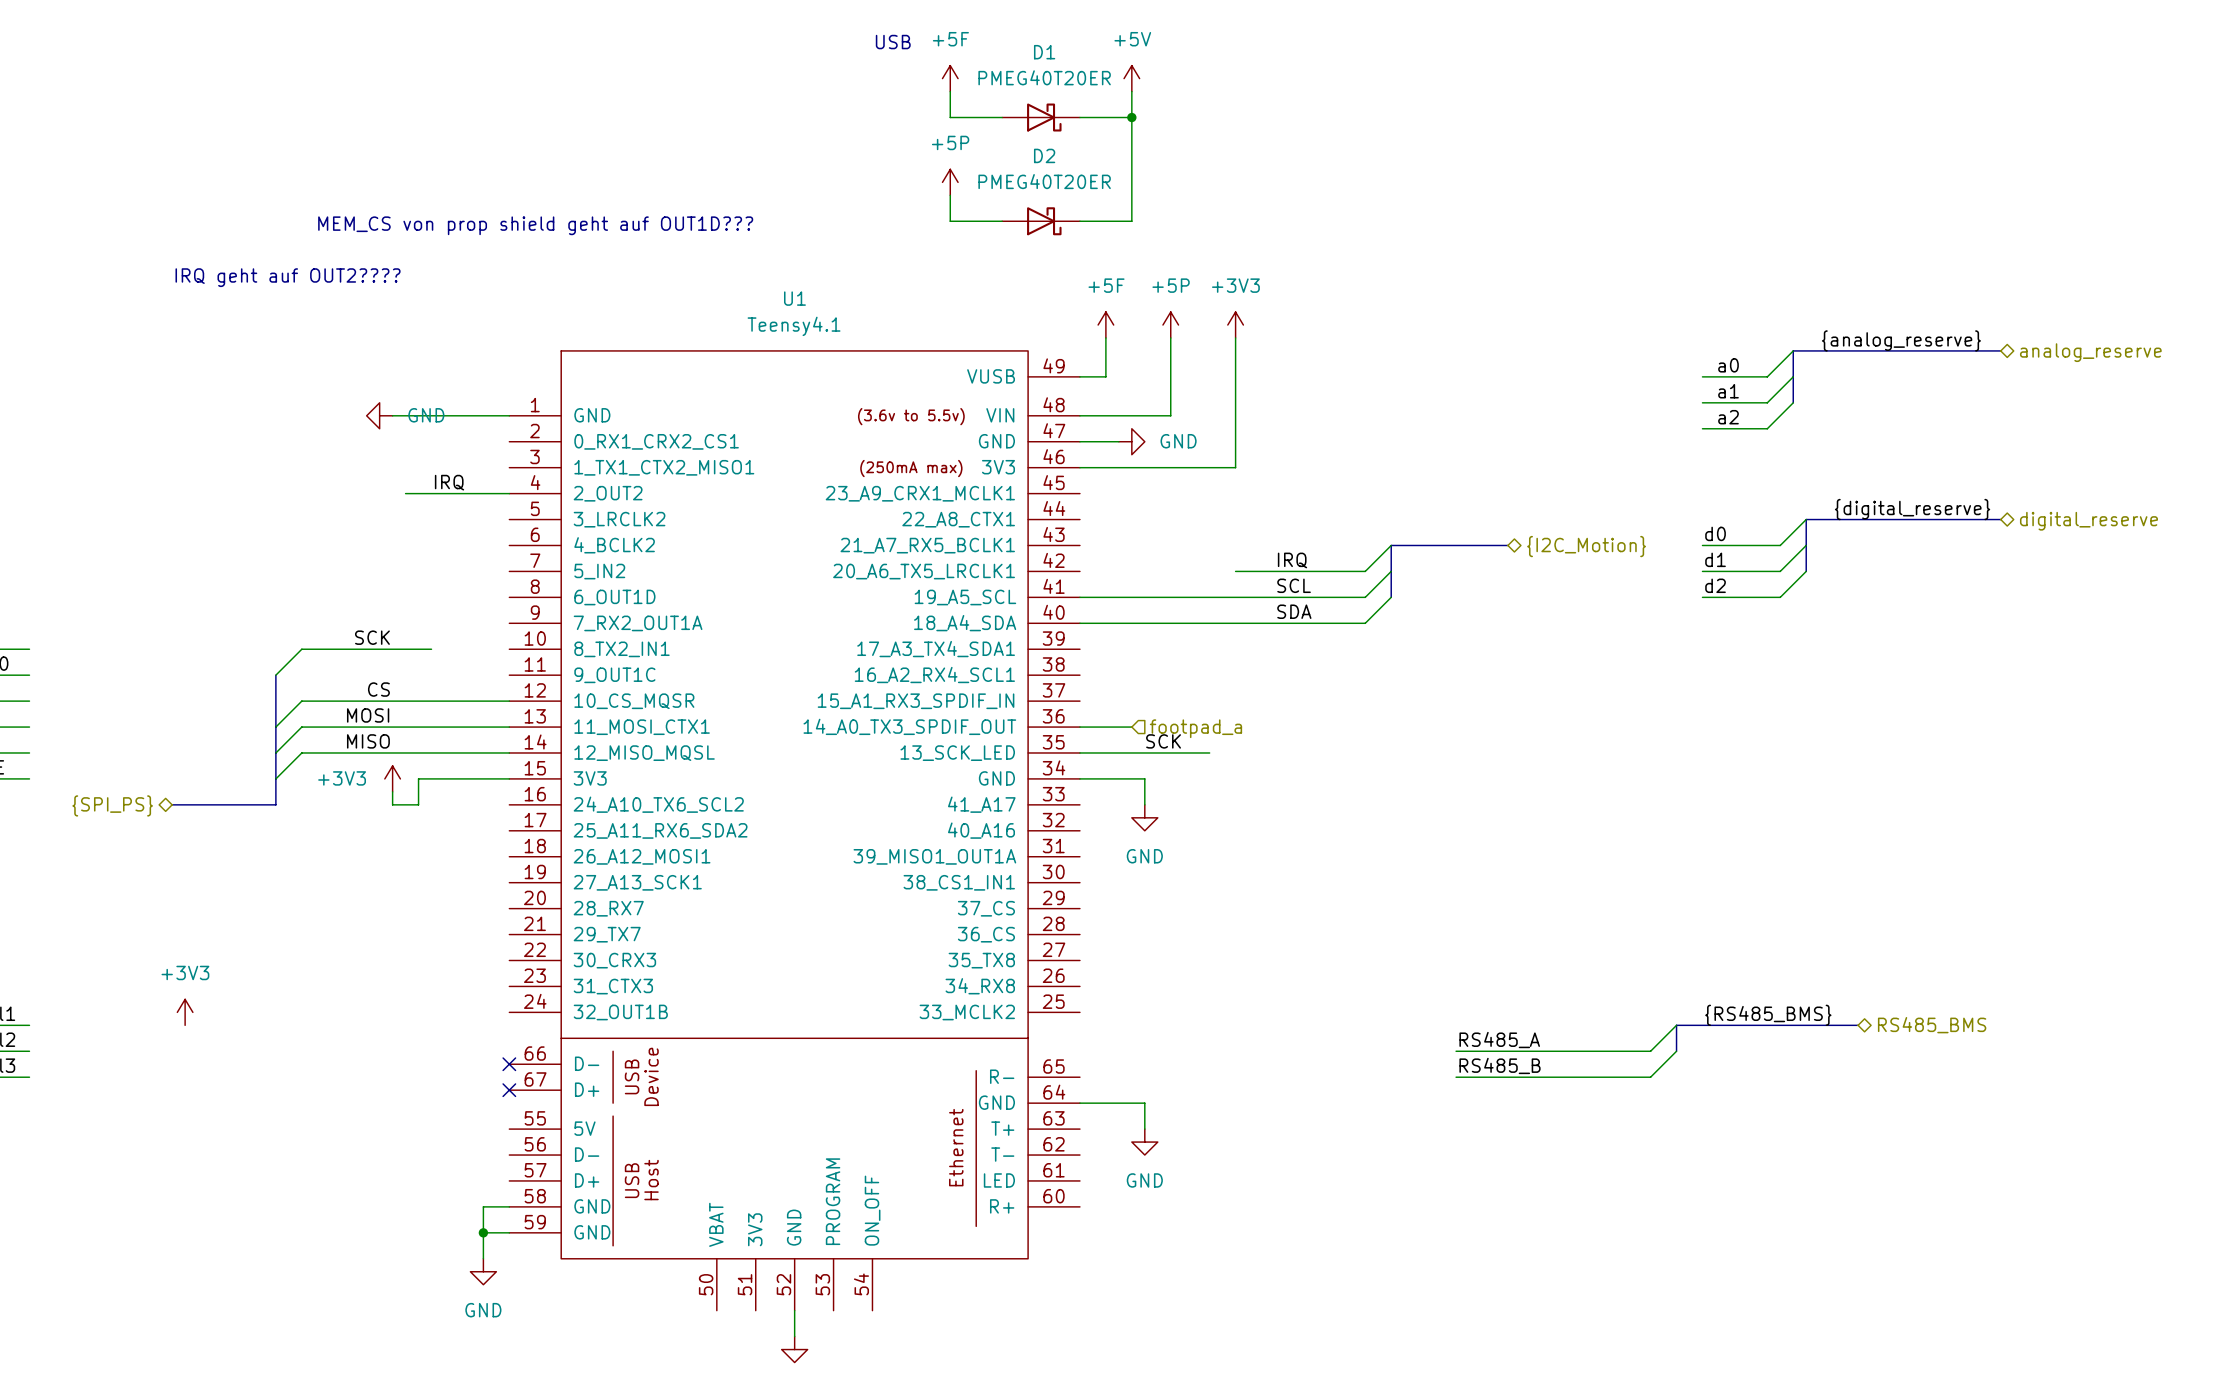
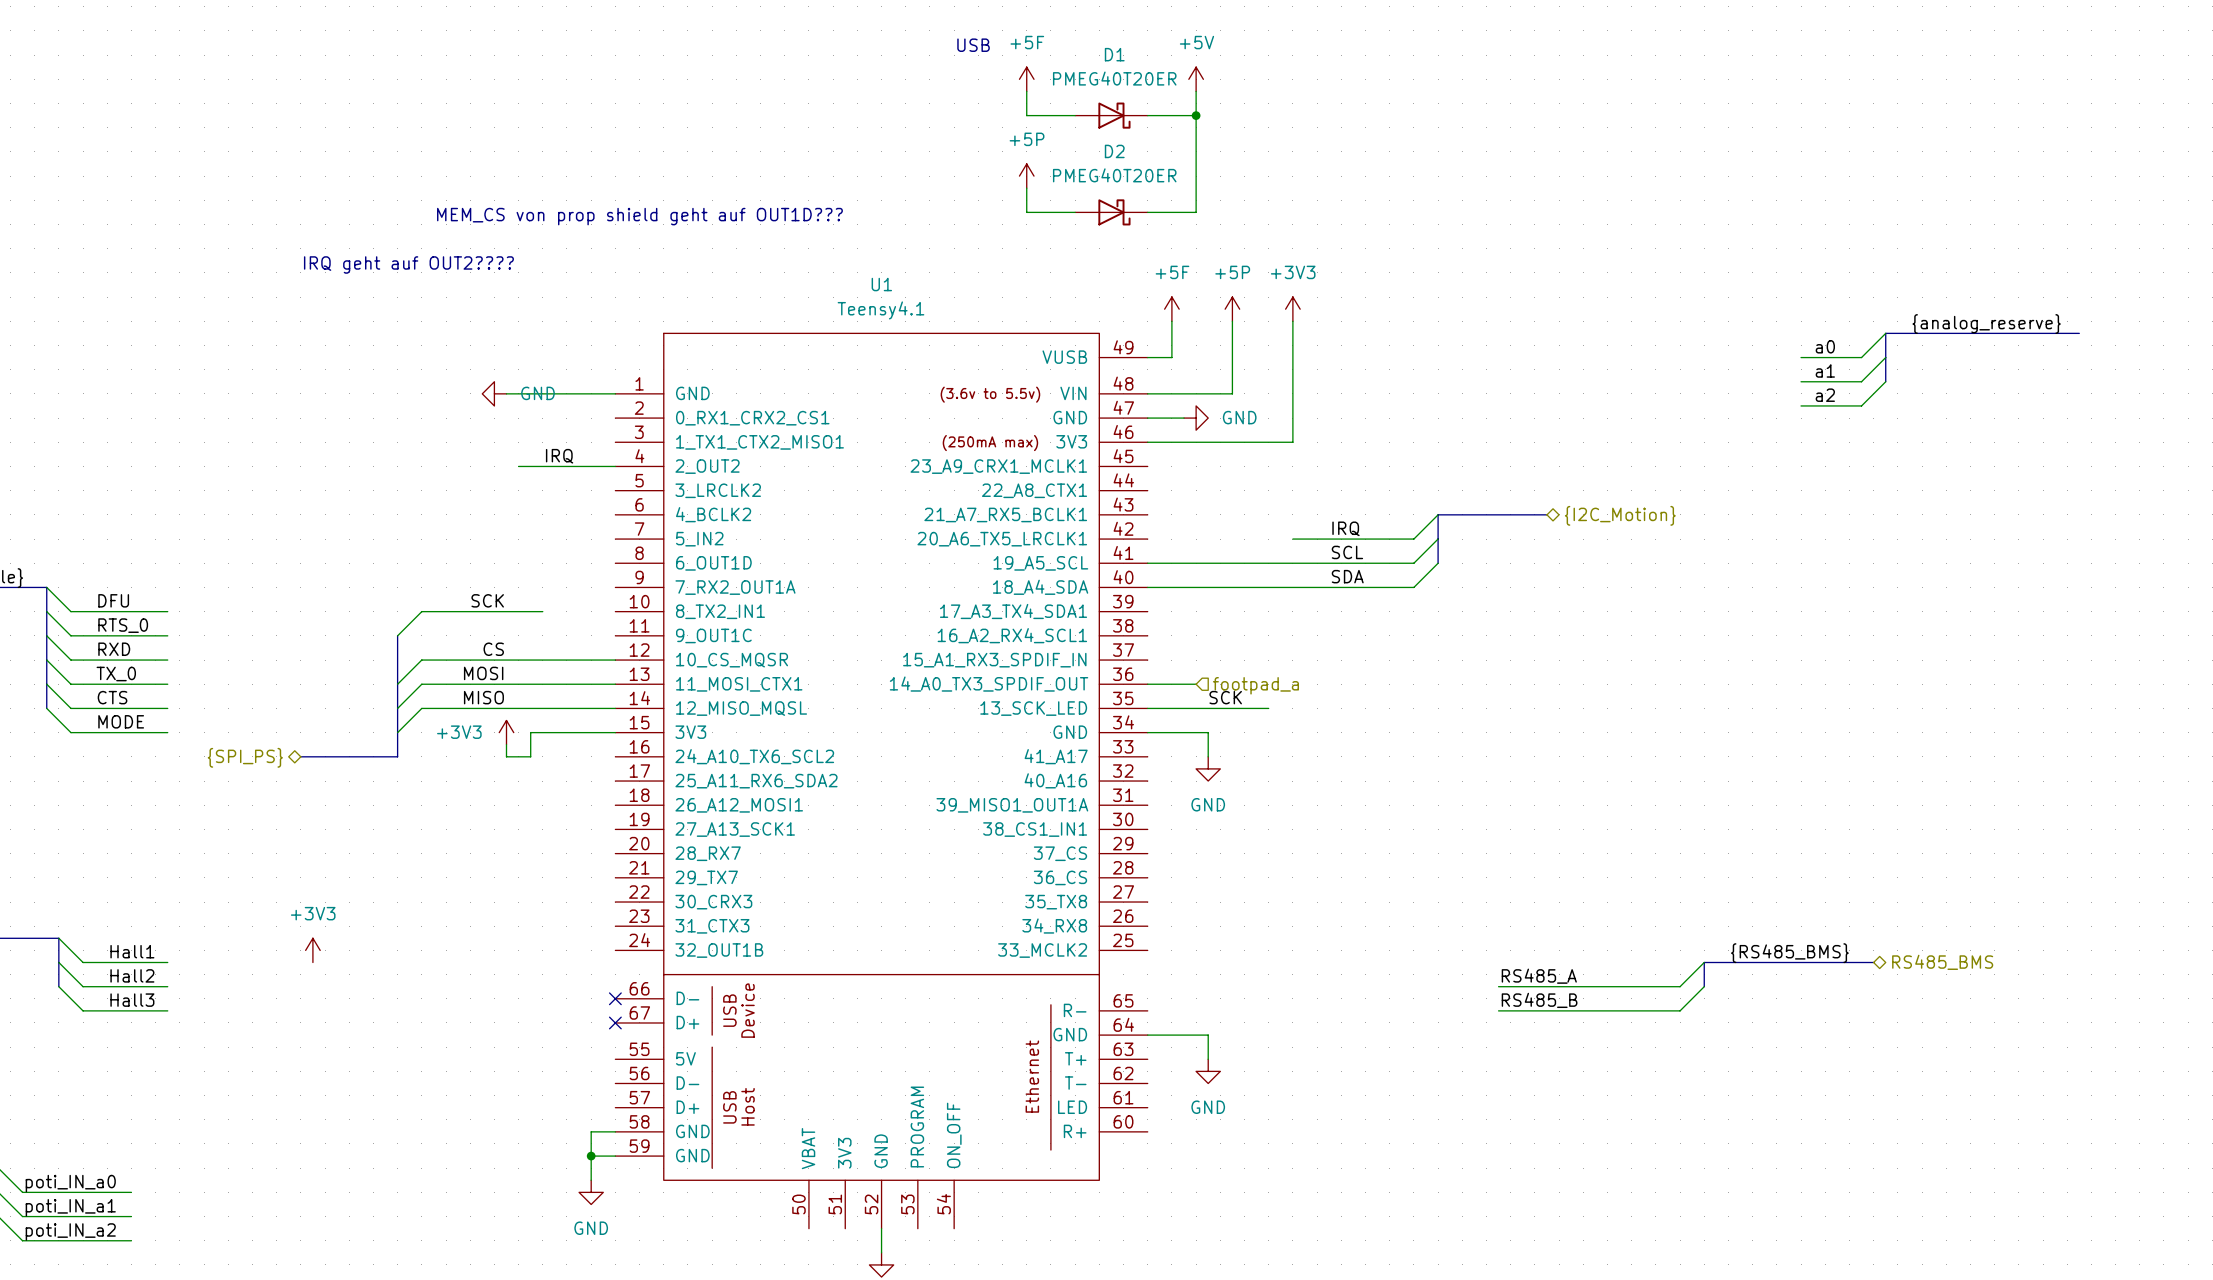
label position: {analog_reserve} (1901, 340) -> {analog_reserve} (1986, 324)
wire: (1793, 350) (1767, 376) (1702, 376) -> (1885, 333) (1861, 357) (1801, 357)
bus: (1871, 350) (1793, 350) (1793, 402) -> (1885, 333) (1885, 381)
bus: none -> (2006, 333) (2079, 333)
hierarchical label: analog_reserve (2090, 352) -> none
label position: a0 (1728, 365) -> a0 (1825, 346)
wire: (1793, 376) (1767, 402) (1702, 402) -> (1885, 357) (1861, 381) (1801, 381)
label position: a1 (1728, 391) -> a1 (1825, 370)
wire: (1793, 402) (1767, 428) (1702, 428) -> (1885, 381) (1861, 405) (1801, 405)
label position: a2 (1728, 417) -> a2 (1825, 395)
label: {digital_reserve} (1912, 509) -> none
wire: (1806, 519) (1780, 545) (1702, 545) -> none
bus: (2000, 519) (1806, 519) (1806, 571) -> none
hierarchical label: digital_reserve (2088, 521) -> none
label: d0 (1715, 533) -> none
wire: (1806, 545) (1780, 571) (1702, 571) -> none
label: d1 (1715, 559) -> none
wire: (1806, 571) (1780, 597) (1702, 597) -> none
label: d2 (1715, 585) -> none

